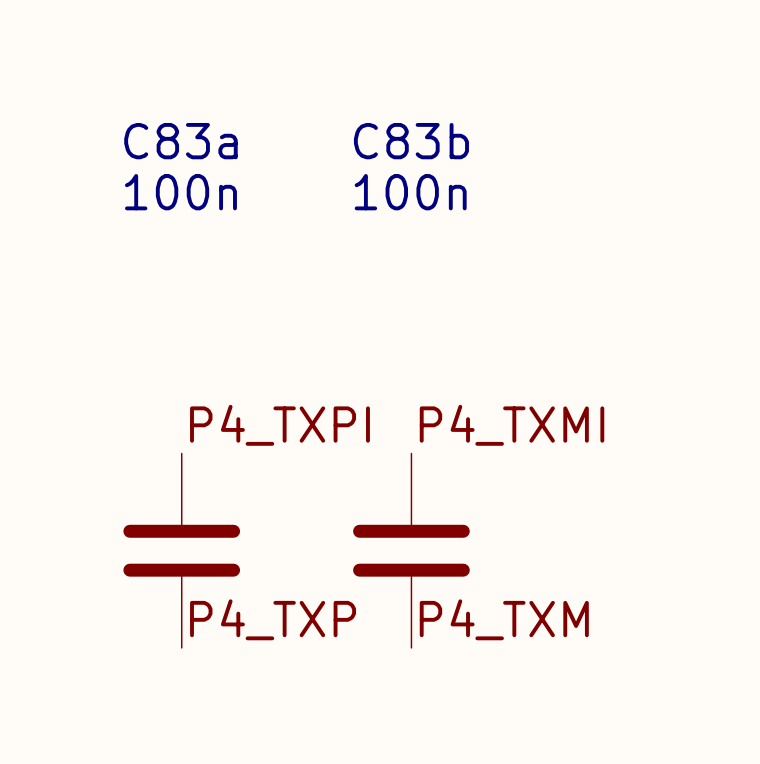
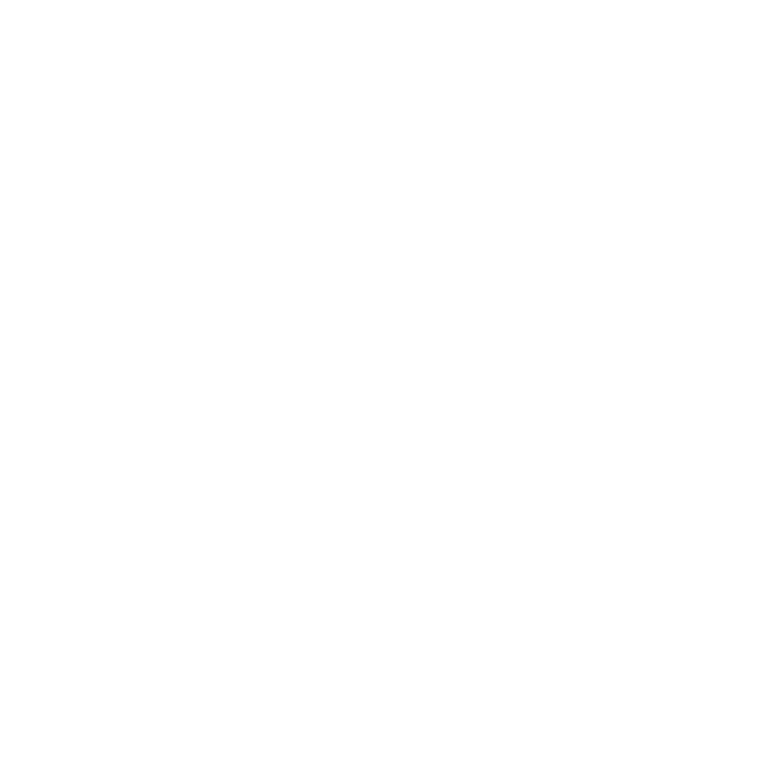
label: P4_TXPI (279, 425) -> none
label: P4_TXMI (512, 425) -> none
C83a: 100n (181, 550) -> none
C83b: 100n (411, 550) -> none
label: P4_TXP (273, 619) -> none
label: P4_TXM (504, 619) -> none

